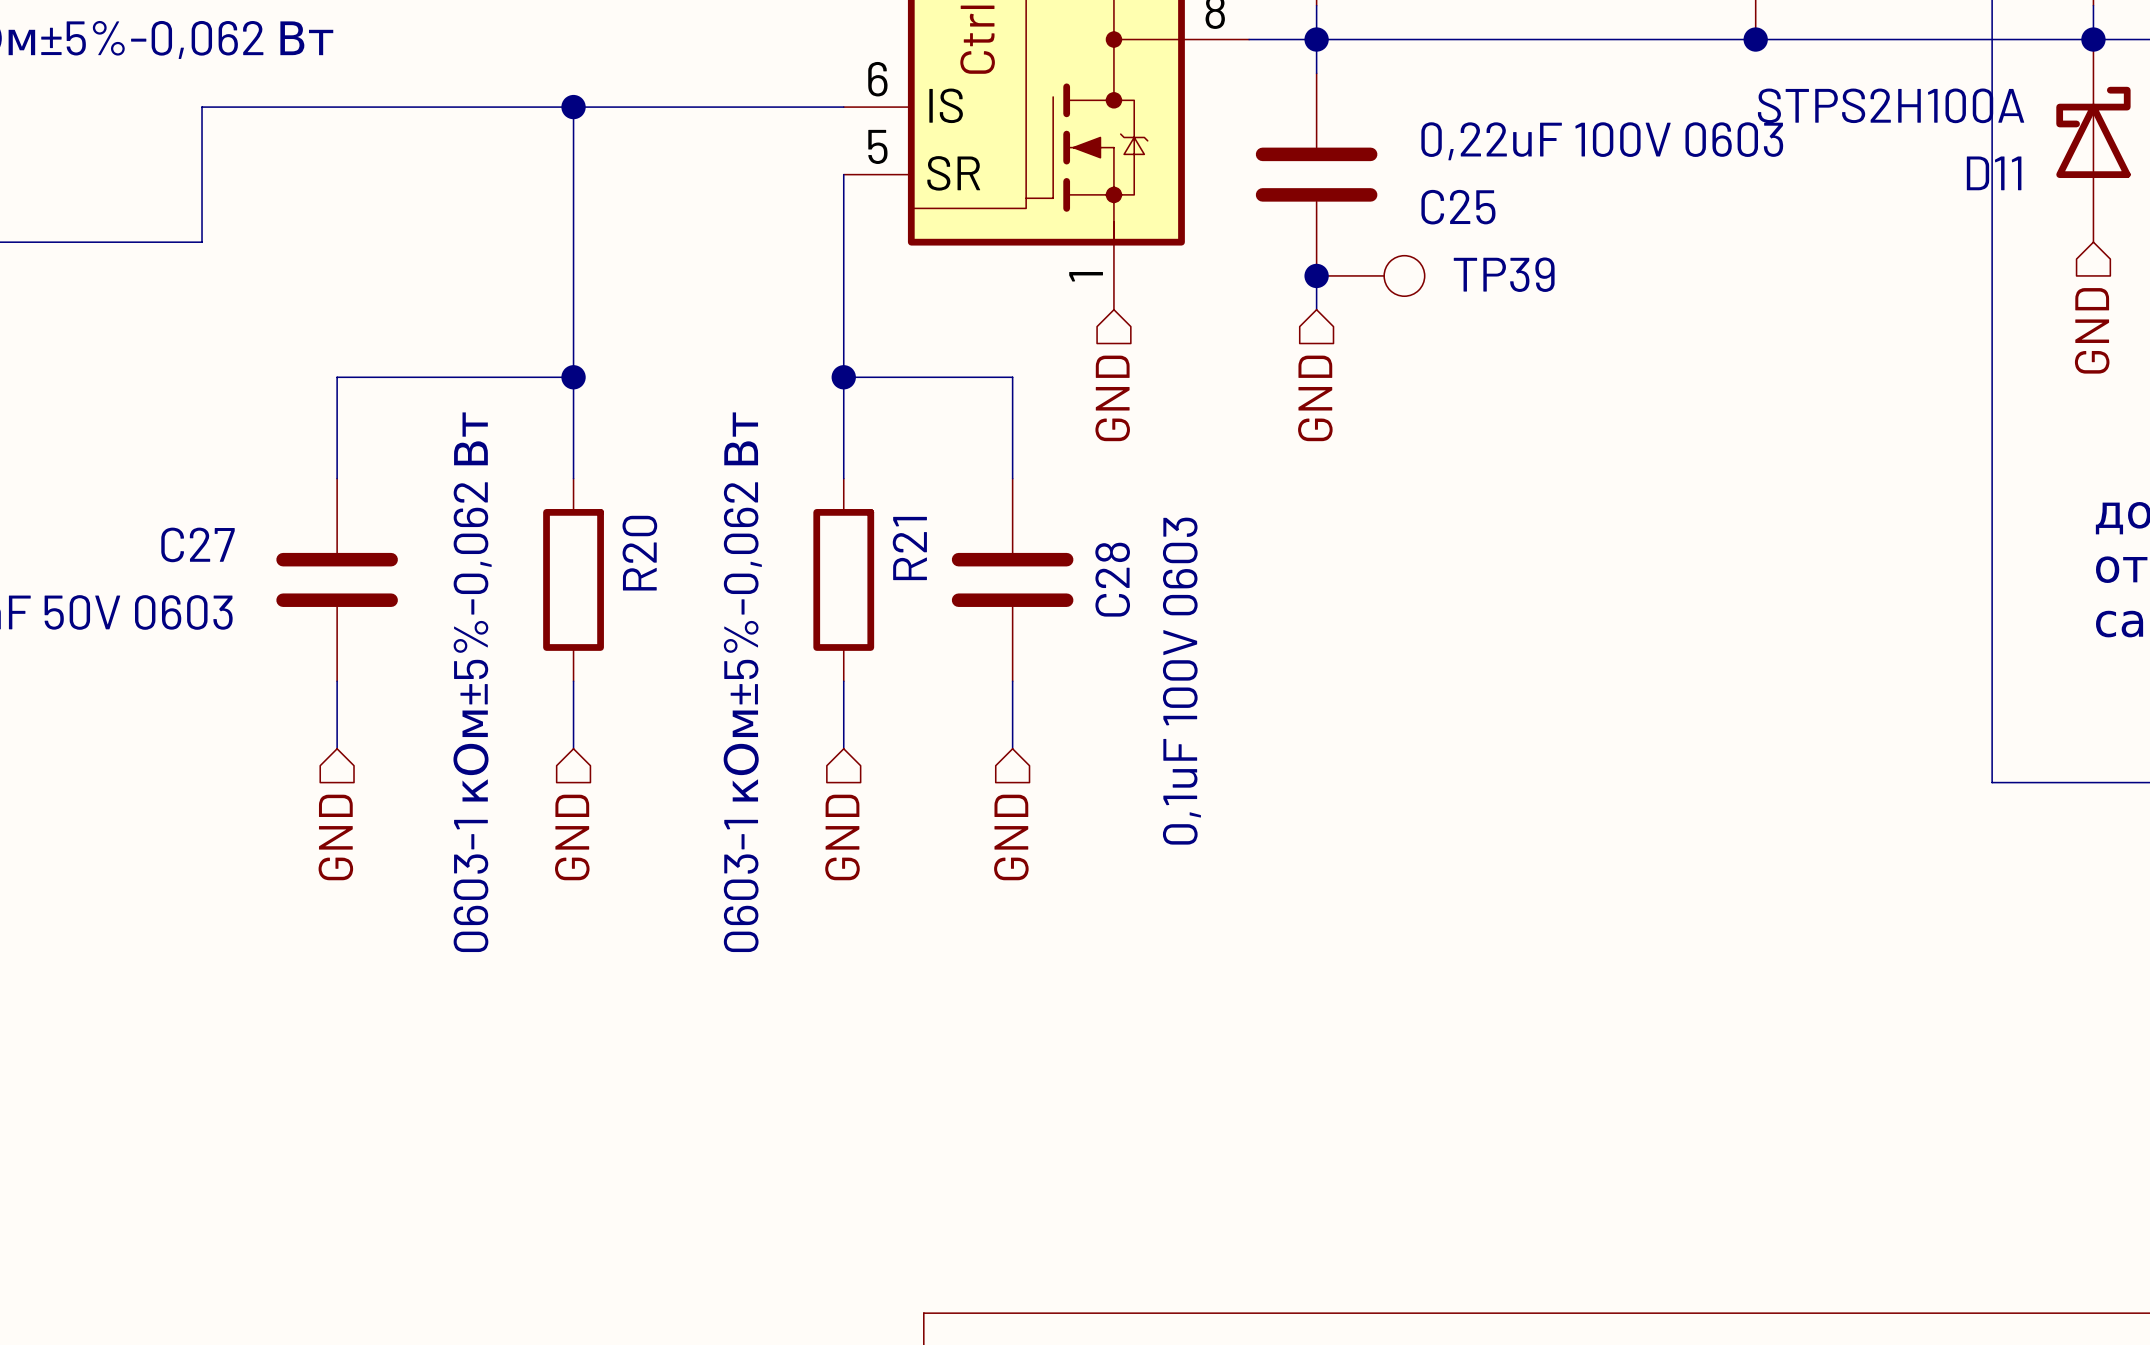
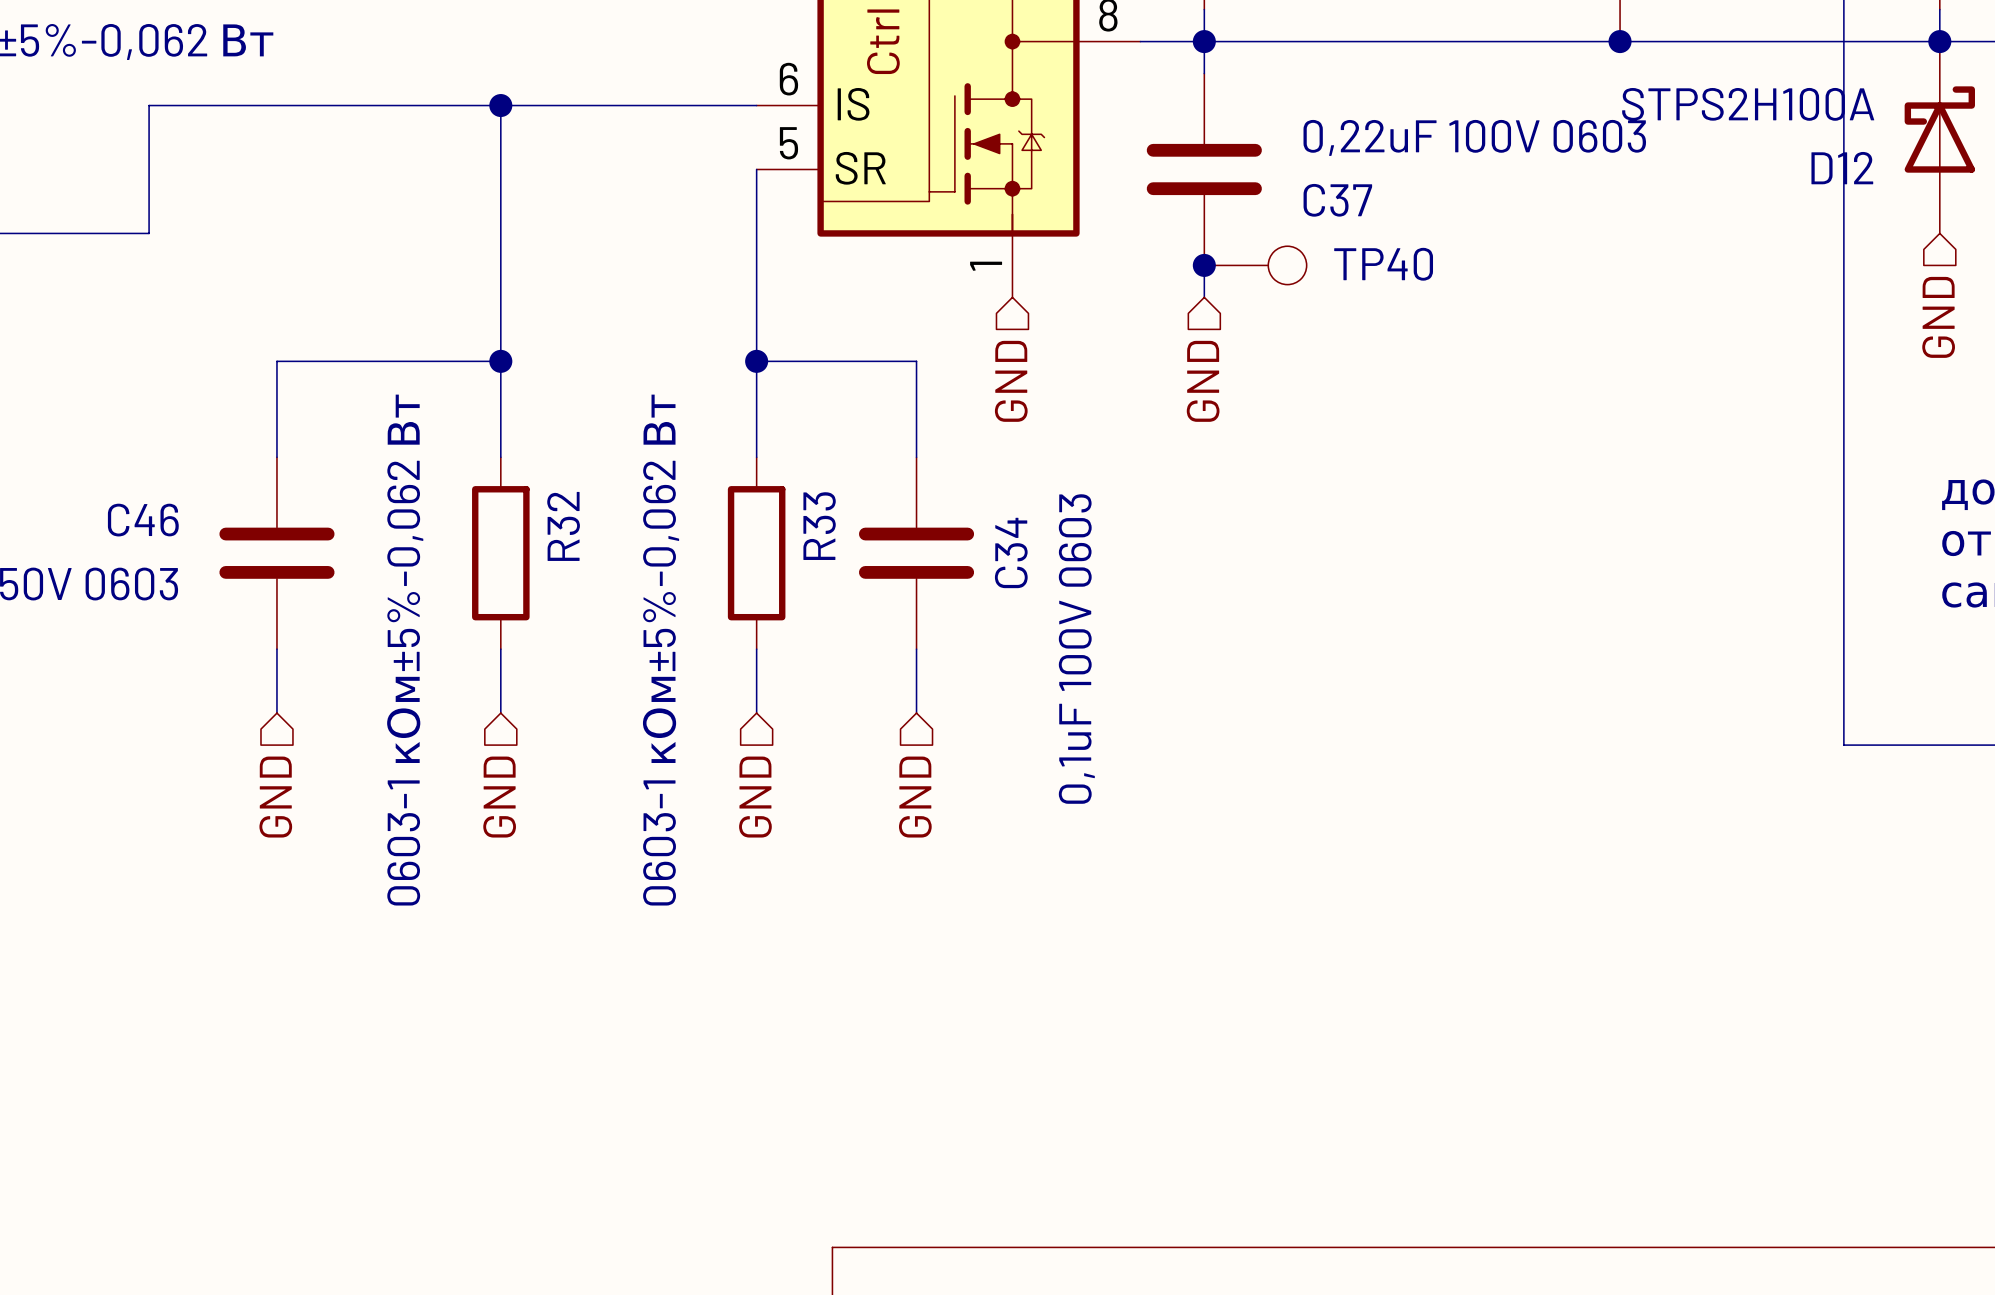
D11 name: D11 (1994, 173) -> D12 (1842, 168)
C25 name: C25 (1458, 207) -> C37 (1337, 200)
TP39 name: TP39 (1504, 274) -> TP40 (1383, 264)
C27 name: C27 (198, 544) -> C46 (143, 520)
R21 name: R21 (909, 548) -> R33 (819, 526)
R20 name: R20 (639, 553) -> R32 (563, 526)
C28 name: C28 (1112, 579) -> C34 (1011, 552)

